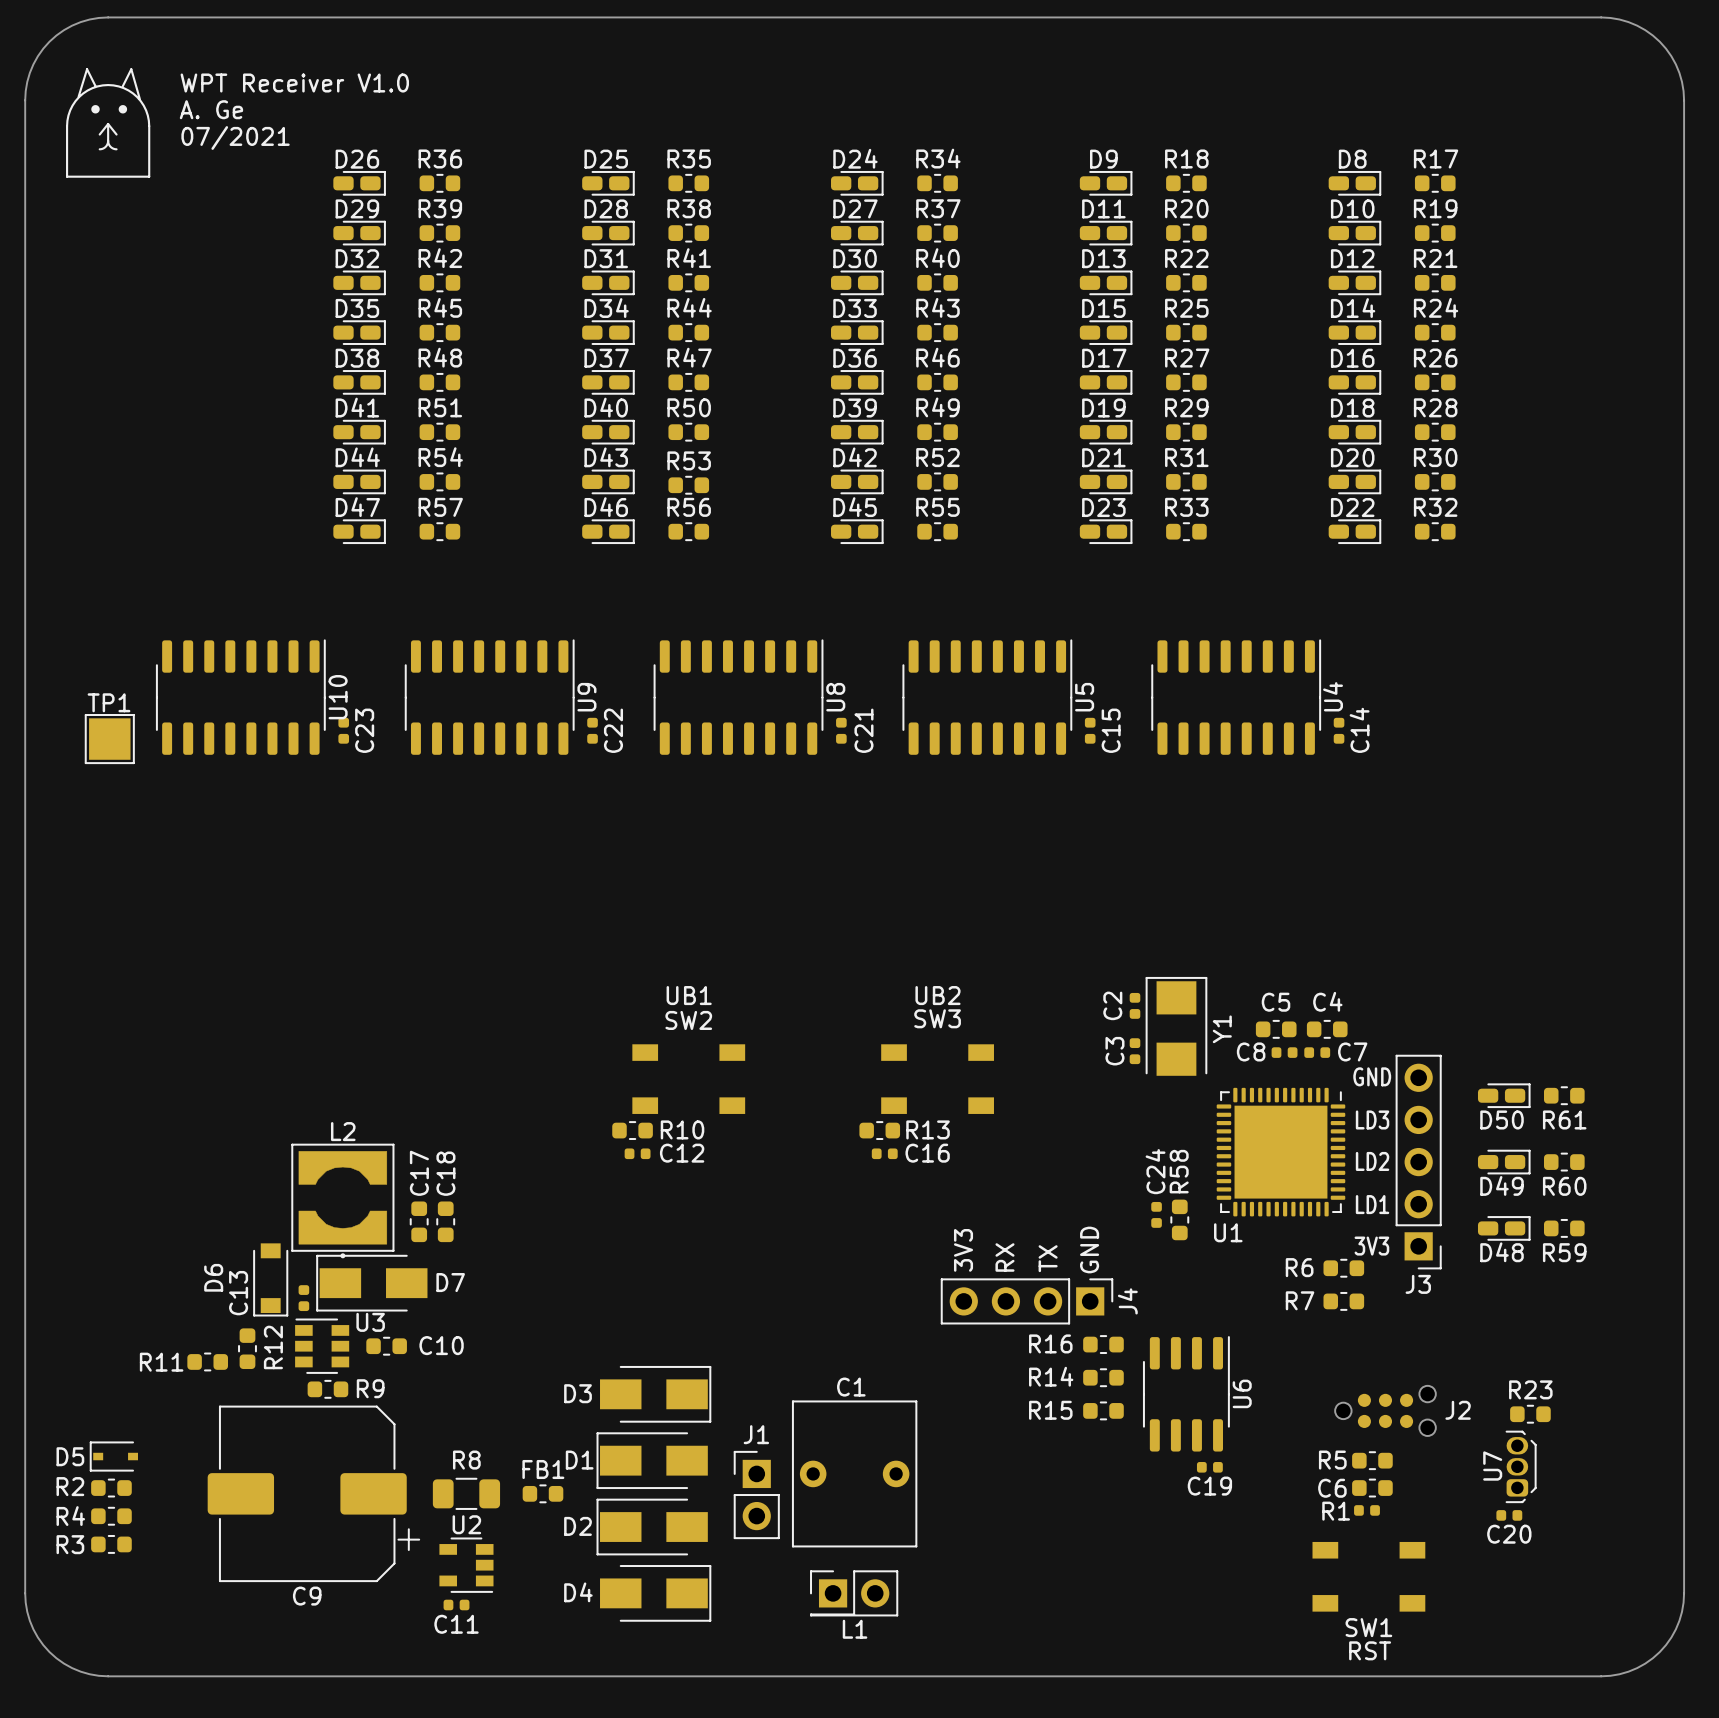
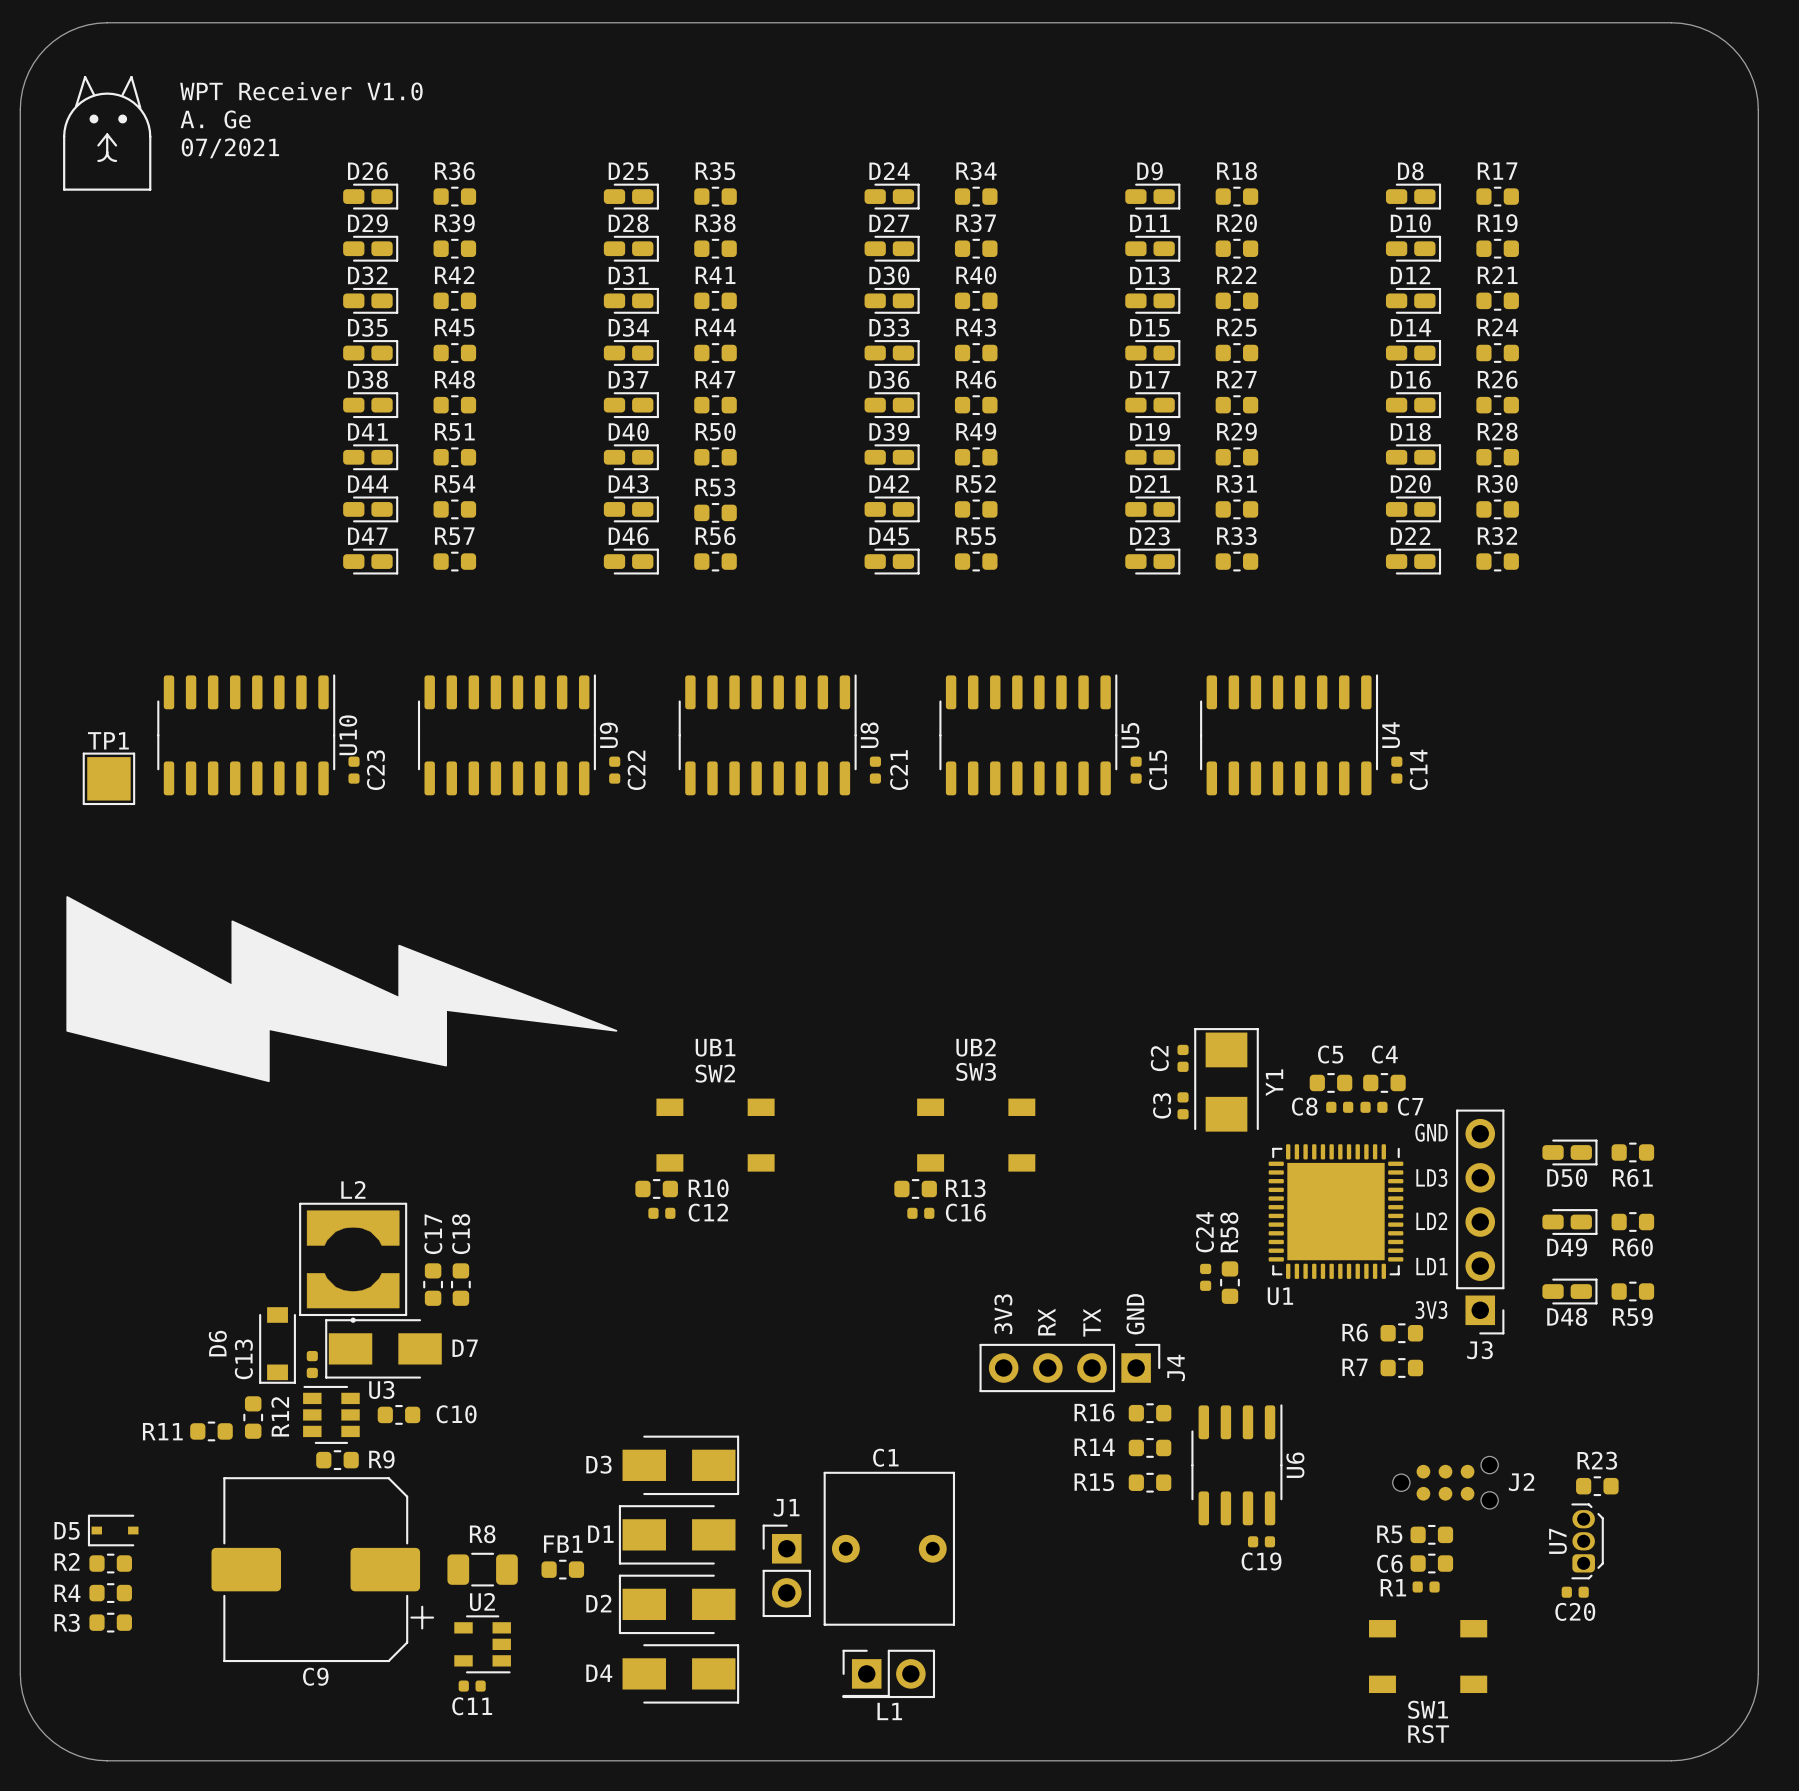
drawing: none -> [66, 896, 618, 1083]

